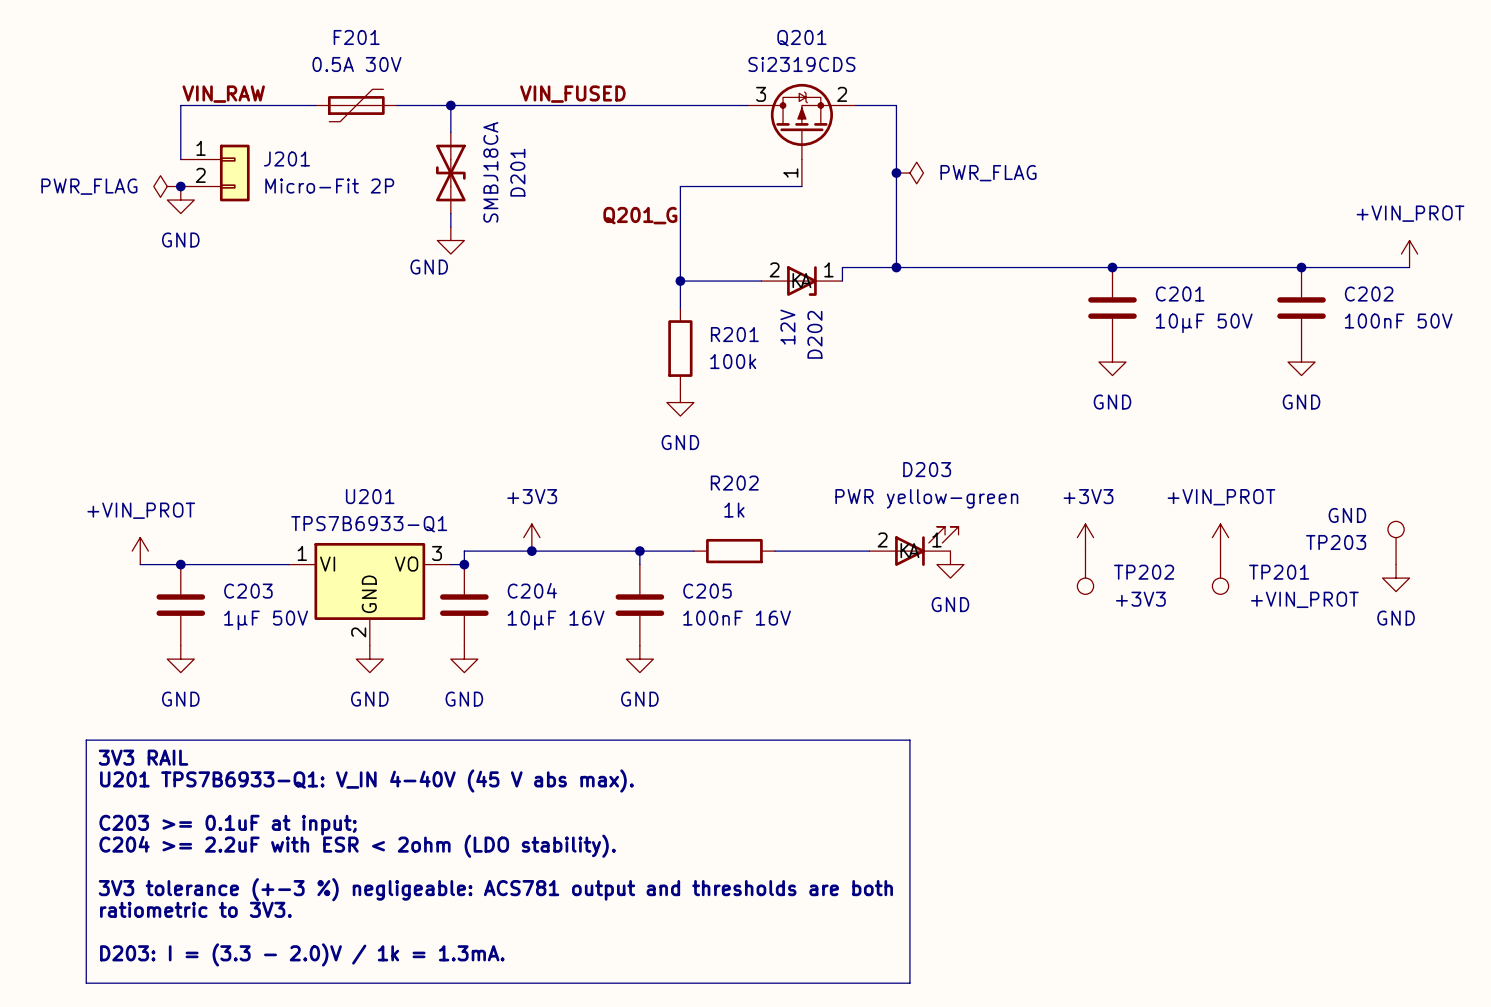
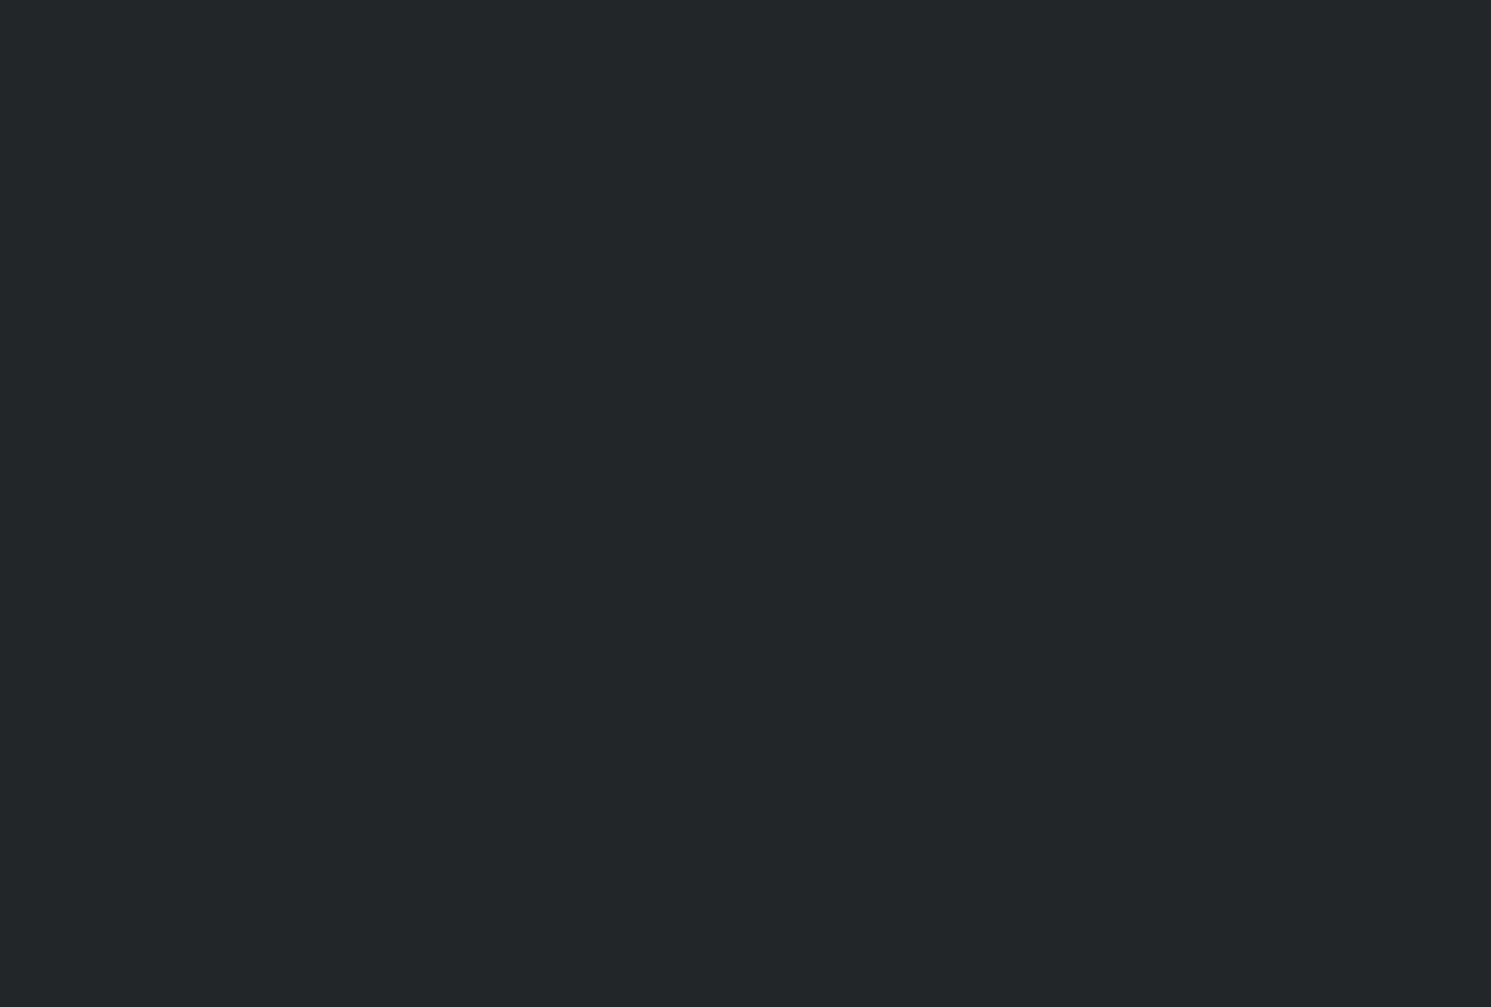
label: VIN_RAW (223, 94) -> none
label: VIN_FUSED (572, 94) -> none
wire: (315, 105) (180, 105) (180, 159) -> none
F201: 0.5A 30V (356, 105) -> none
wire: (396, 105) (747, 105) -> none
wire: (450, 105) (450, 132) -> none
junction: (450, 105) -> none
wire: (855, 105) (896, 105) (896, 267) -> none
Q201: Si2319CDS (801, 135) -> none
J201: Micro-Fit 2P (215, 173) -> none
D201: SMBJ18CA (450, 173) -> none
junction: (896, 173) -> none
power symbol: PWR_FLAG (909, 173) -> none
power symbol: PWR_FLAG (167, 186) -> none
junction: (180, 186) -> none
wire: (801, 186) (680, 186) (680, 308) -> none
power symbol: GND (180, 200) -> none
wire: (450, 213) (450, 227) -> none
label: Q201_G (640, 215) -> none
power symbol: GND (450, 240) -> none
power symbol: +VIN_PROT (1409, 254) -> none
junction: (896, 267) -> none
junction: (1112, 267) -> none
junction: (1301, 267) -> none
wire: (1409, 267) (842, 267) (842, 281) -> none
wire: (680, 281) (761, 281) -> none
junction: (680, 281) -> none
D202: 12V (801, 281) -> none
C201: 10µF 50V (1112, 308) -> none
C202: 100nF 50V (1301, 308) -> none
R201: 100k (680, 348) -> none
power symbol: GND (1112, 362) -> none
power symbol: GND (1301, 362) -> none
power symbol: GND (680, 402) -> none
power symbol: +3V3 (531, 537) -> none
power symbol: +3V3 (1085, 537) -> none
power symbol: +VIN_PROT (1220, 537) -> none
TP203: GND (1396, 542) -> none
D203: PWR yellow-green (913, 546) -> none
power symbol: +VIN_PROT (140, 551) -> none
junction: (531, 551) -> none
wire: (639, 551) (639, 564) -> none
junction: (639, 551) -> none
wire: (693, 551) (464, 551) (464, 564) (450, 564) -> none
R202: 1k (734, 551) -> none
wire: (774, 551) (869, 551) -> none
wire: (140, 564) (288, 564) -> none
junction: (180, 564) -> none
junction: (464, 564) -> none
power symbol: GND (950, 564) -> none
TP202: +3V3 (1085, 572) -> none
TP201: +VIN_PROT (1220, 572) -> none
power symbol: GND (1396, 578) -> none
U201: TPS7B6933-Q1 (369, 594) -> none
C203: 1µF 50V (180, 605) -> none
C204: 10µF 16V (464, 605) -> none
C205: 100nF 16V (639, 605) -> none
power symbol: GND (180, 659) -> none
power symbol: GND (369, 659) -> none
power symbol: GND (464, 659) -> none
power symbol: GND (639, 659) -> none
line: (86, 740) (909, 740) (909, 983) (86, 983) (86, 740) -> none
text: 3V3 RAIL (143, 757) -> none
text: U201 TPS7B6933-Q1: V_IN 4-40V (45 V abs max). (366, 781) -> none
text: C203 >= 0.1uF at input; (228, 825) -> none
text: C204 >= 2.2uF with ESR < 2ohm (LDO stability). (357, 846) -> none
text: 3V3 tolerance (+-3 %) negligeable: ACS781 output and thresholds are both (495, 889) -> none
text: ratiometric to 3V3. (195, 909) -> none
text: D203: I = (3.3 - 2.0)V / 1k = 1.3mA. (302, 954) -> none

